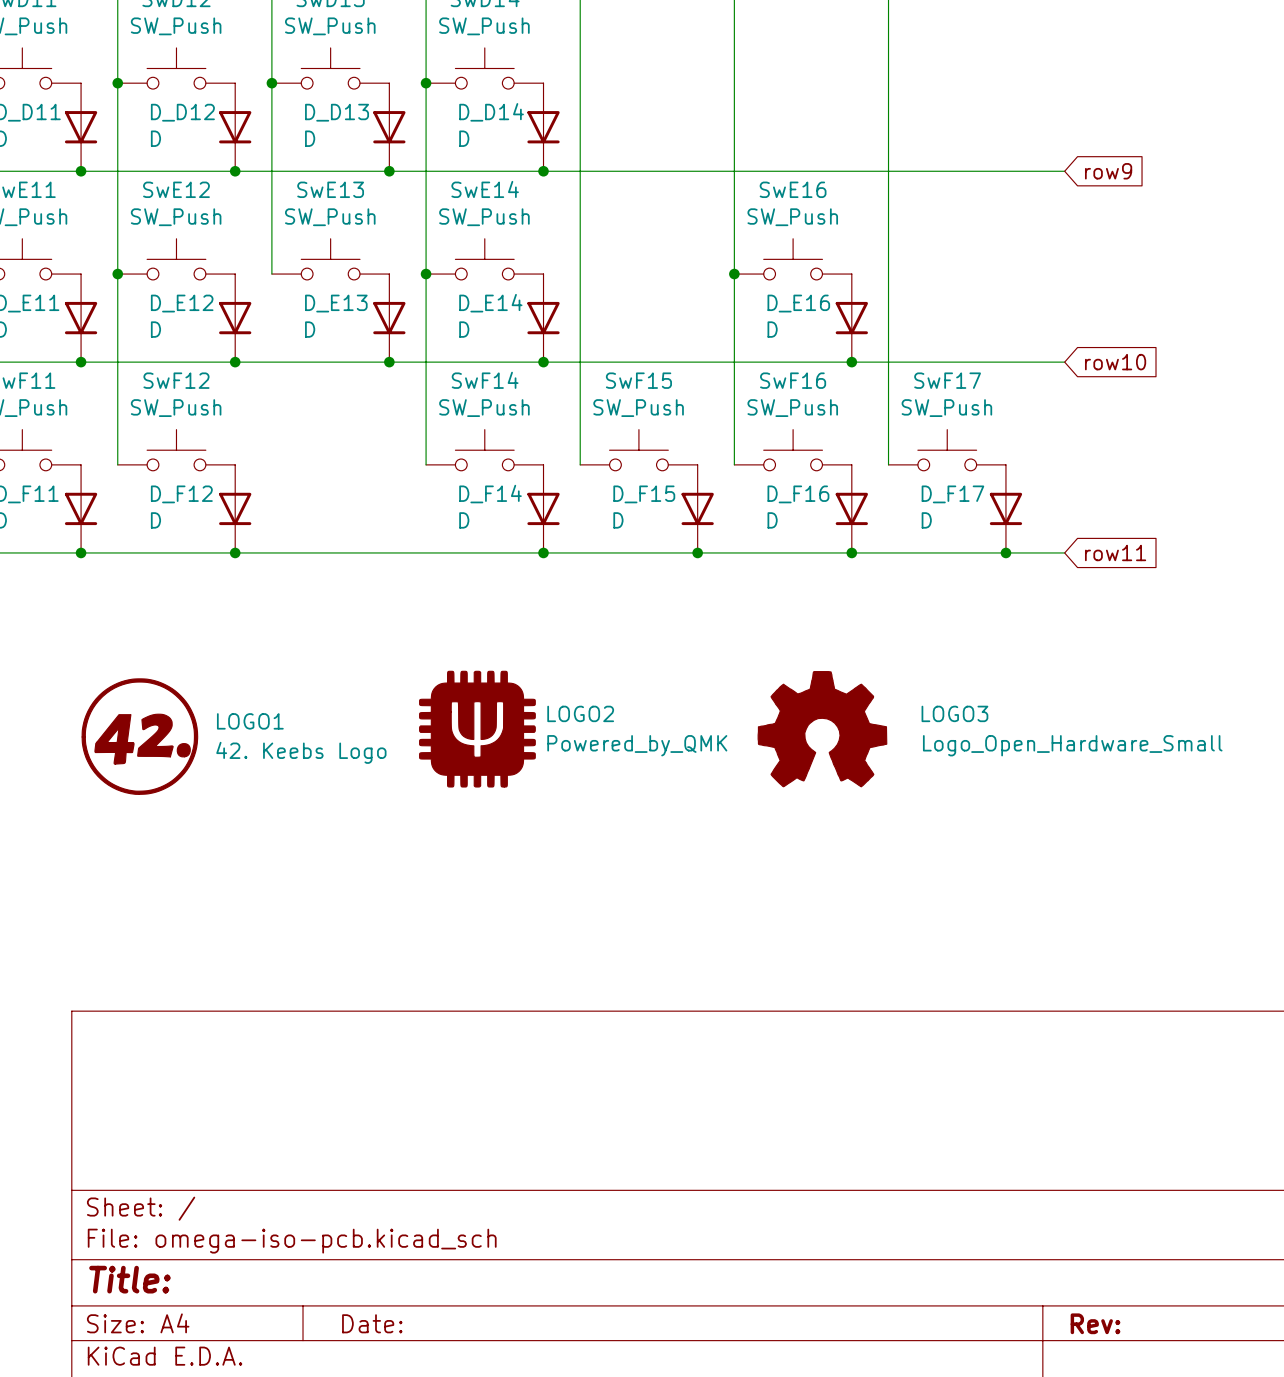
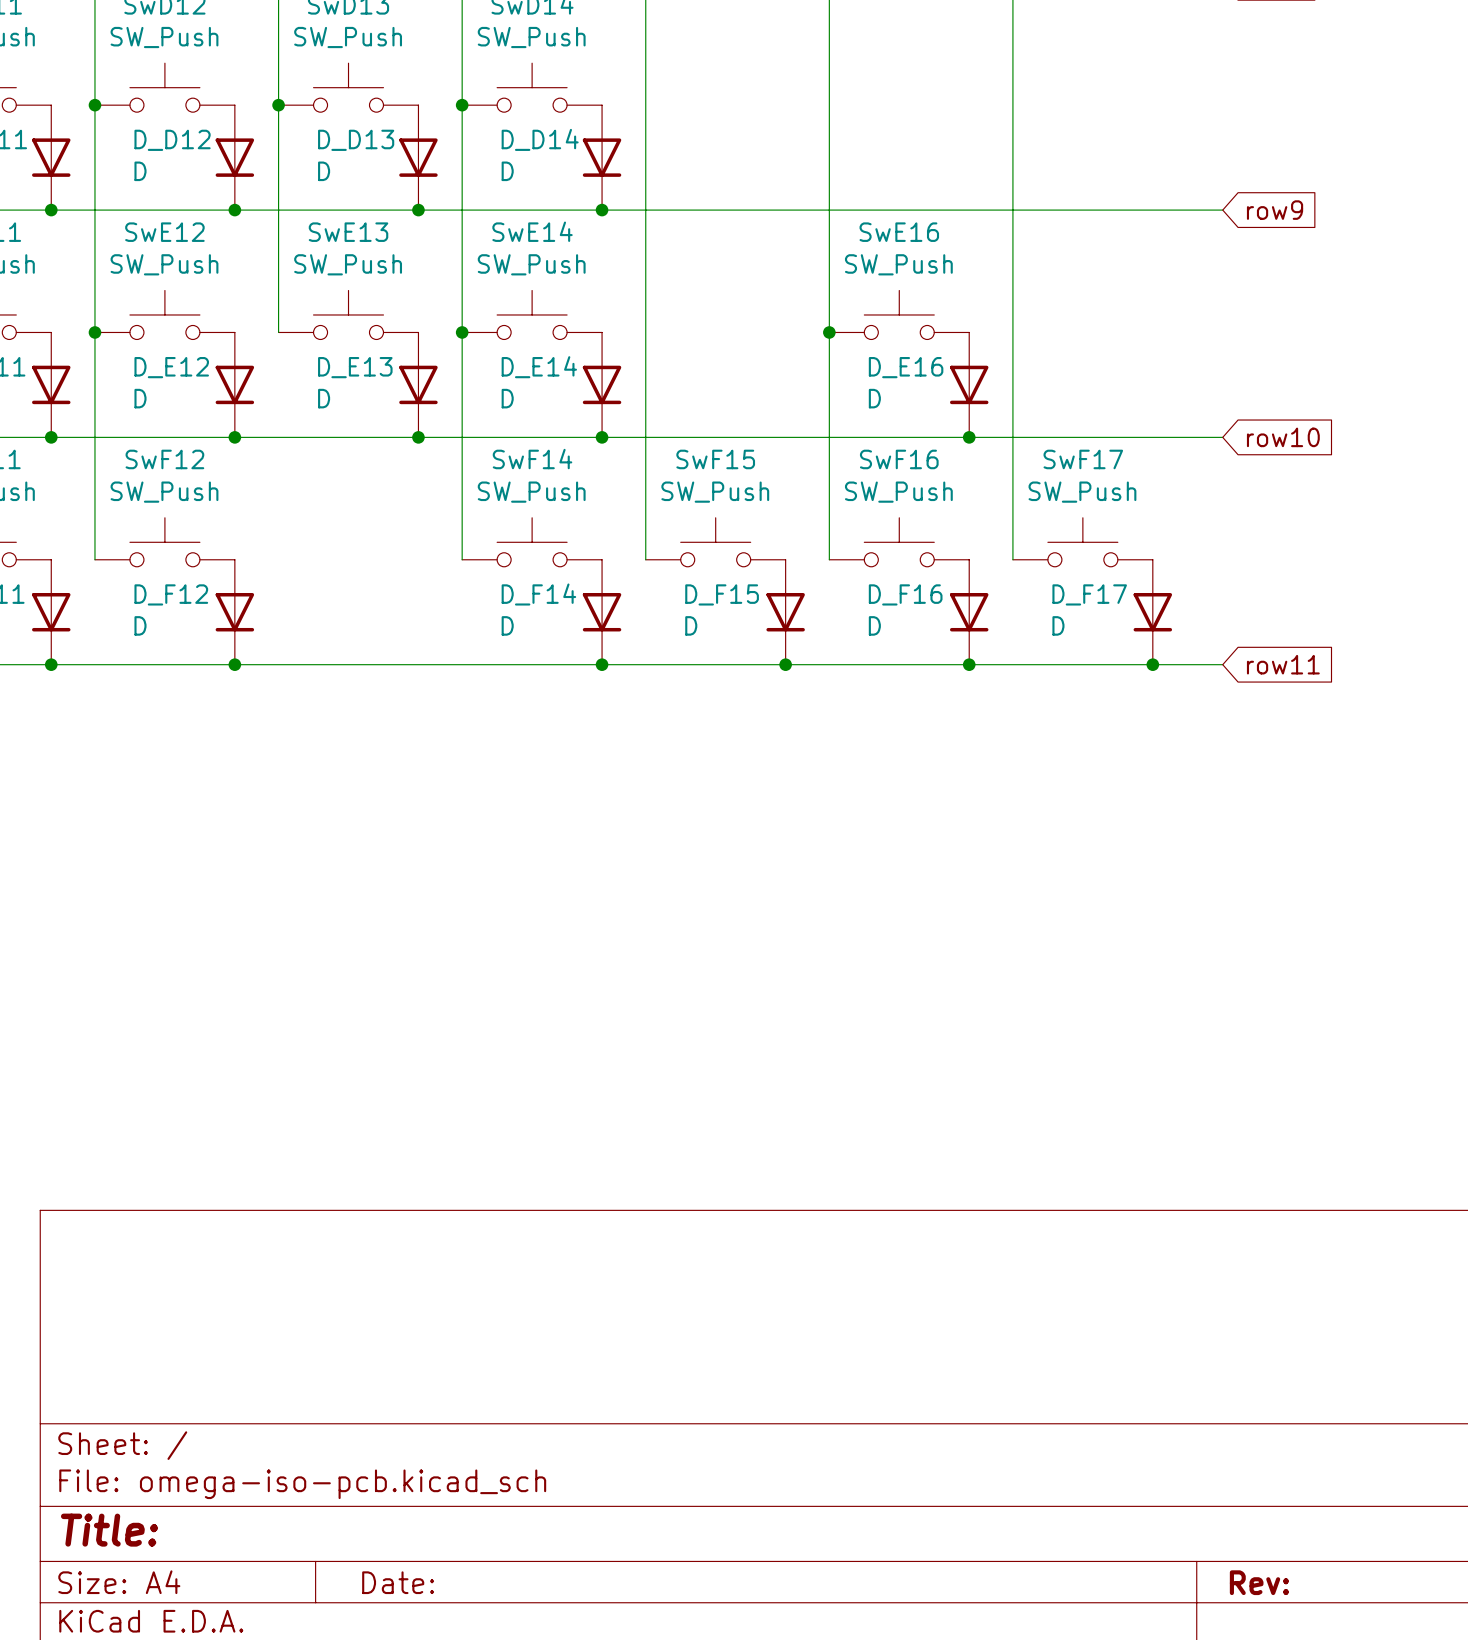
LOGO2: Powered_by_QMK (477, 729) -> none
LOGO3: Logo_Open_Hardware_Small (822, 729) -> none
LOGO1: 42. Keebs Logo (139, 736) -> none

